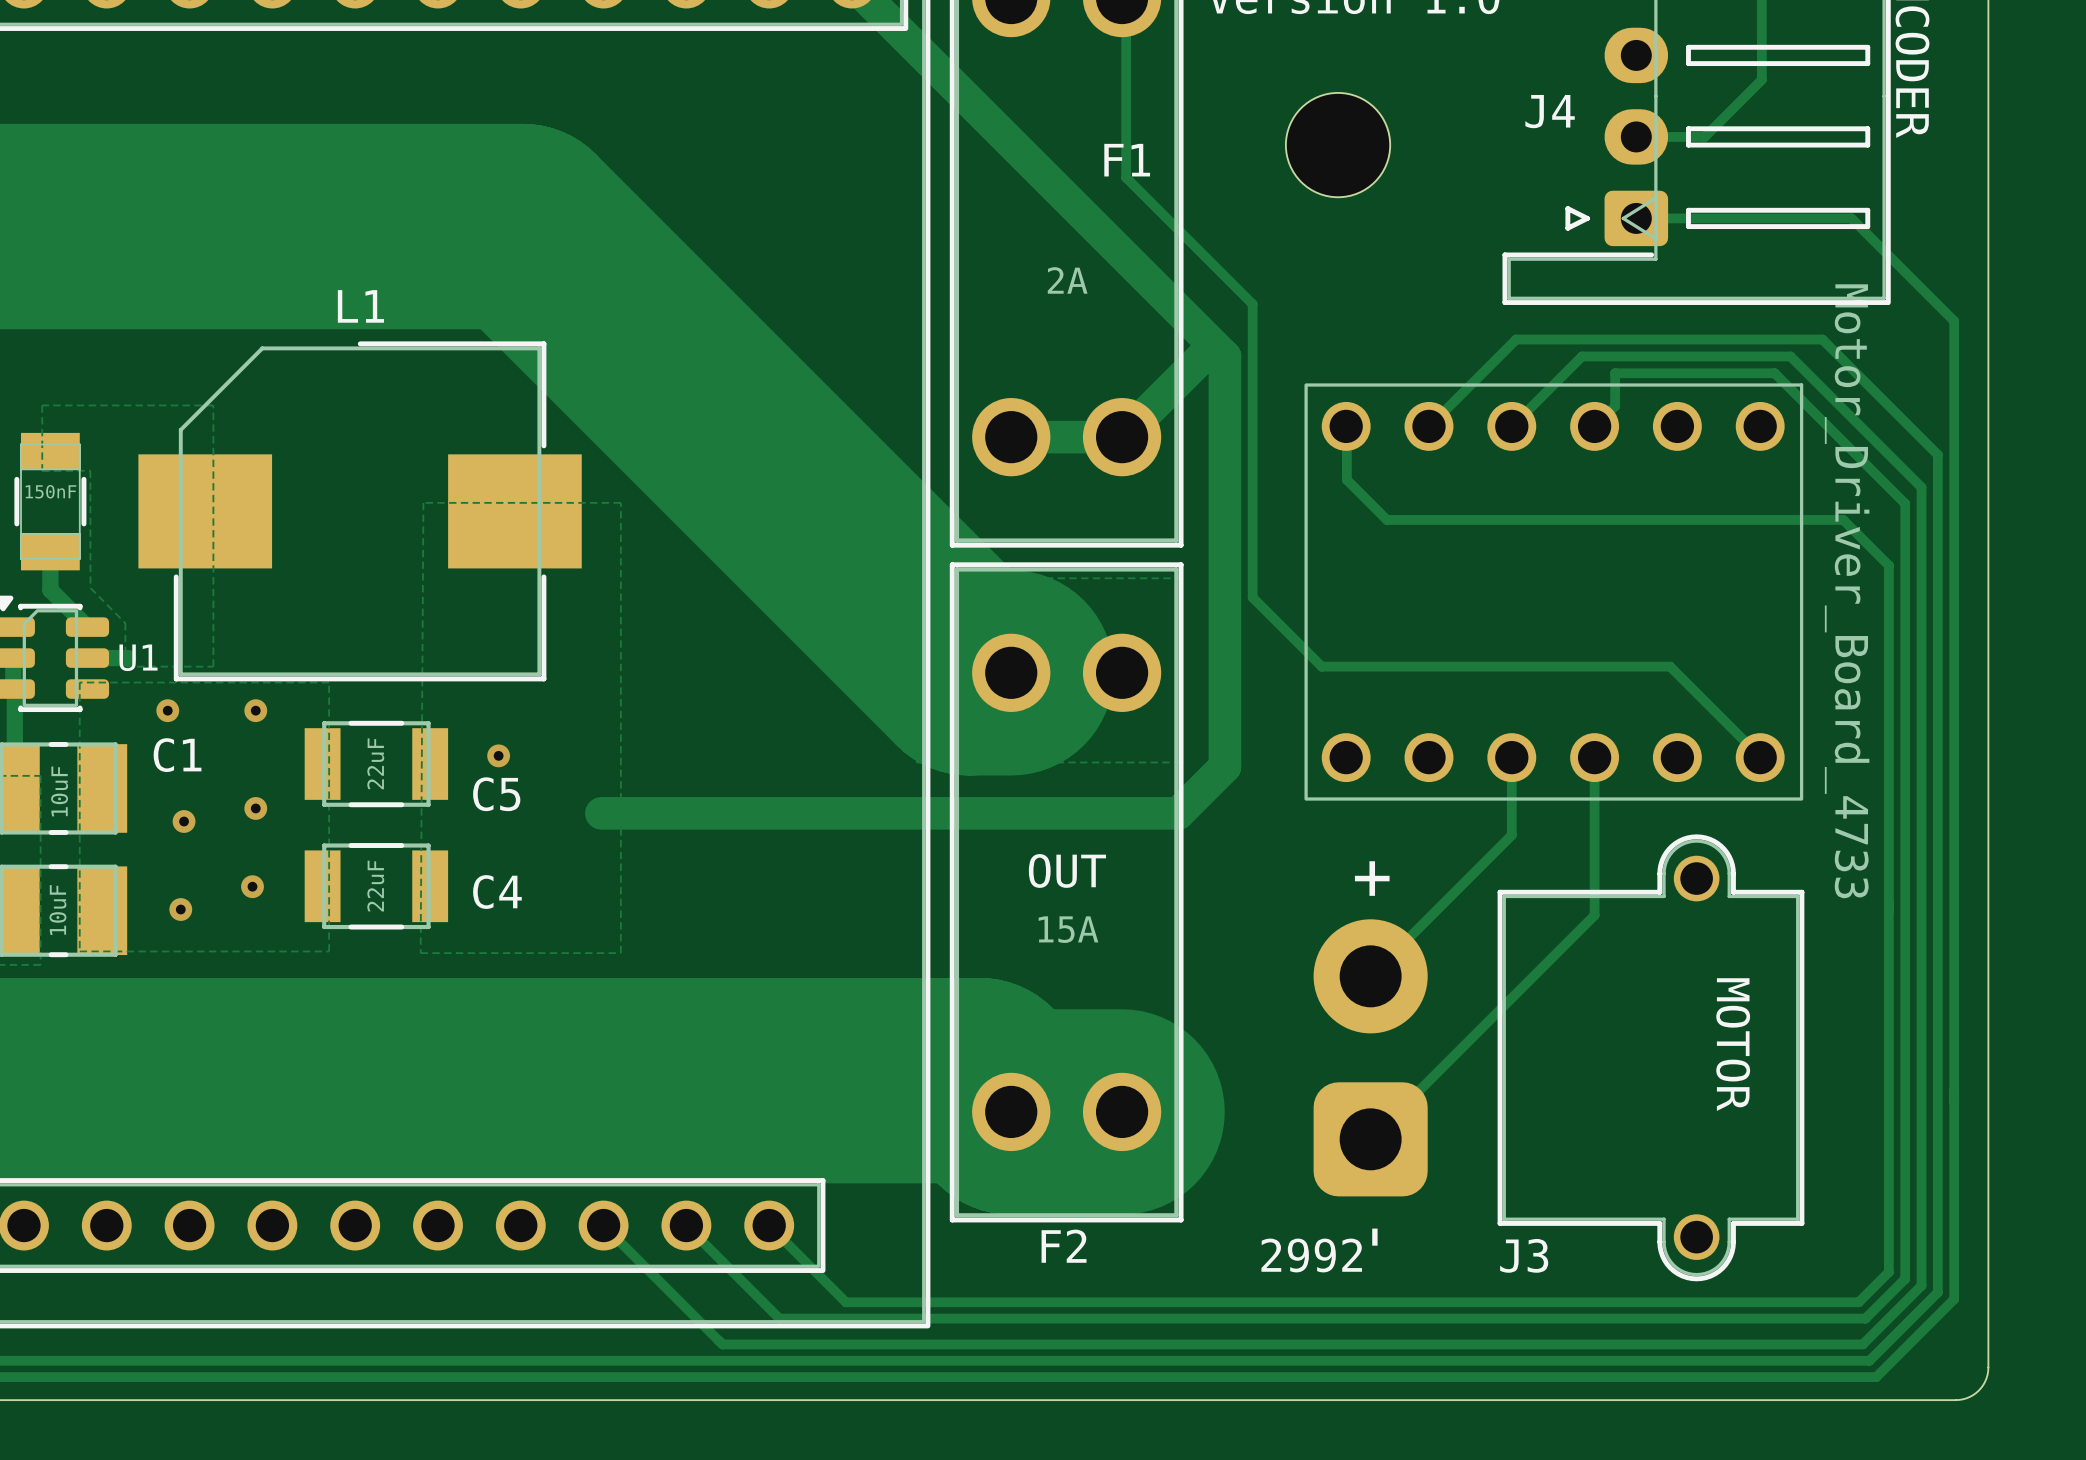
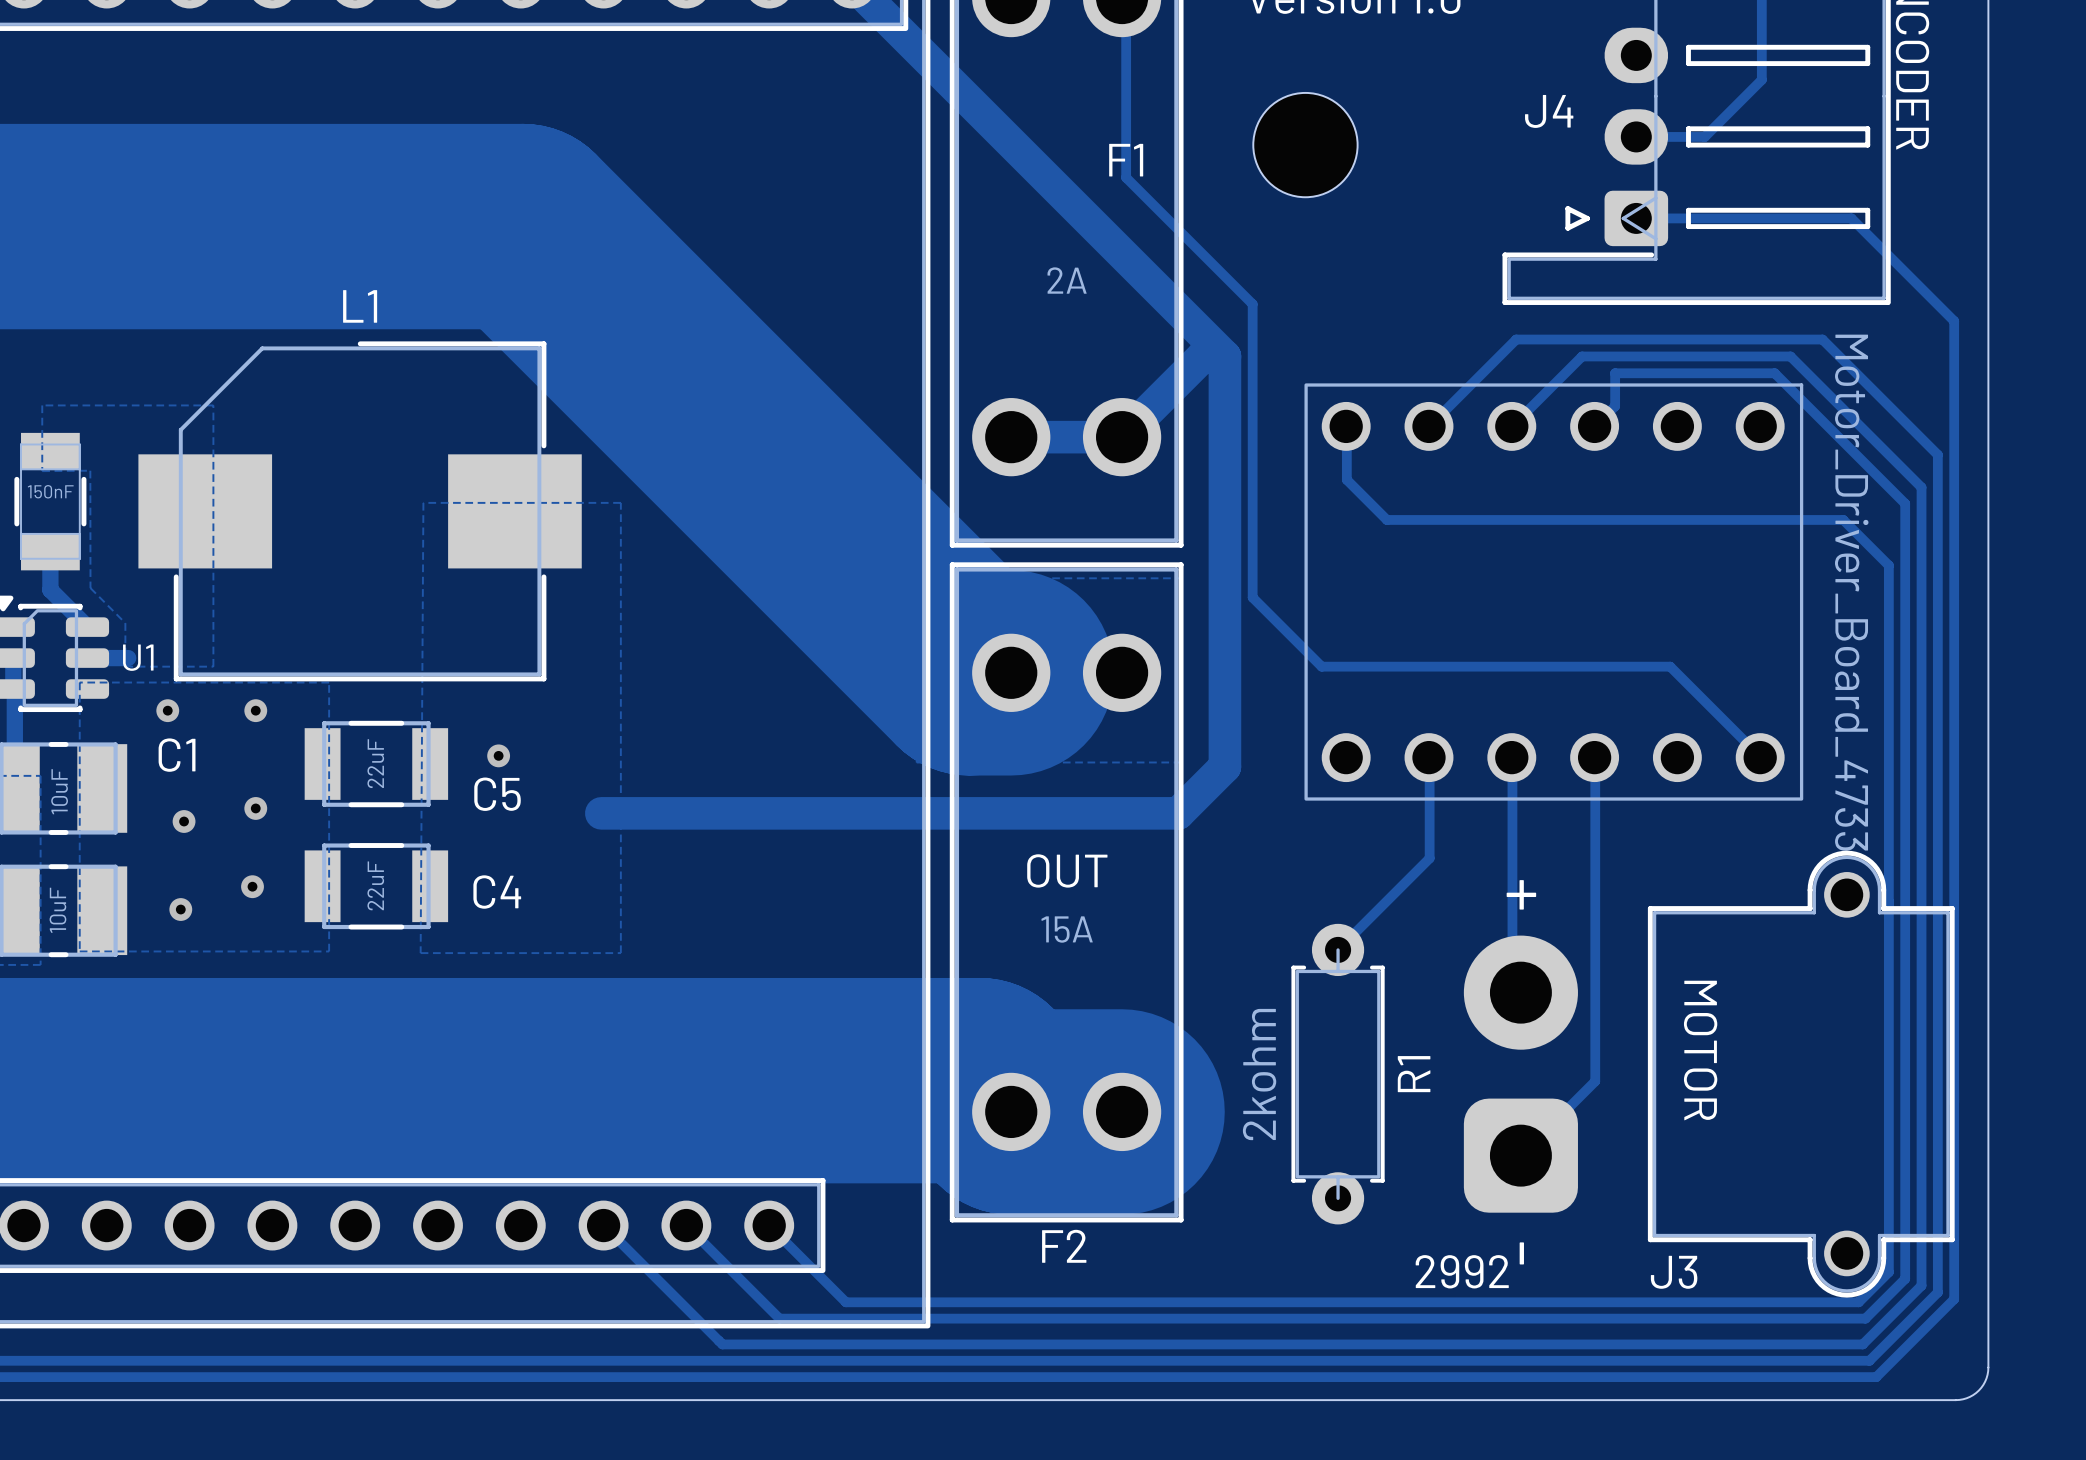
part position: (1338, 145) -> (1305, 145)
track: none -> (1429, 757) (1429, 858) (1338, 949)
track: (1511, 757) (1511, 835) (1370, 976) (1362, 967) -> (1512, 757) (1512, 984) (1520, 992)
track: (1594, 757) (1594, 915) (1340, 1169) -> (1595, 757) (1595, 1081) (1491, 1185)
text position: MOTOR (1733, 1044) -> MOTOR (1700, 1050)
J3 position: (1558, 1057) -> (1709, 1074)
R1: none -> 2kohm (1338, 1074)
text position: 2992 (1311, 1255) -> 2992 (1462, 1271)

